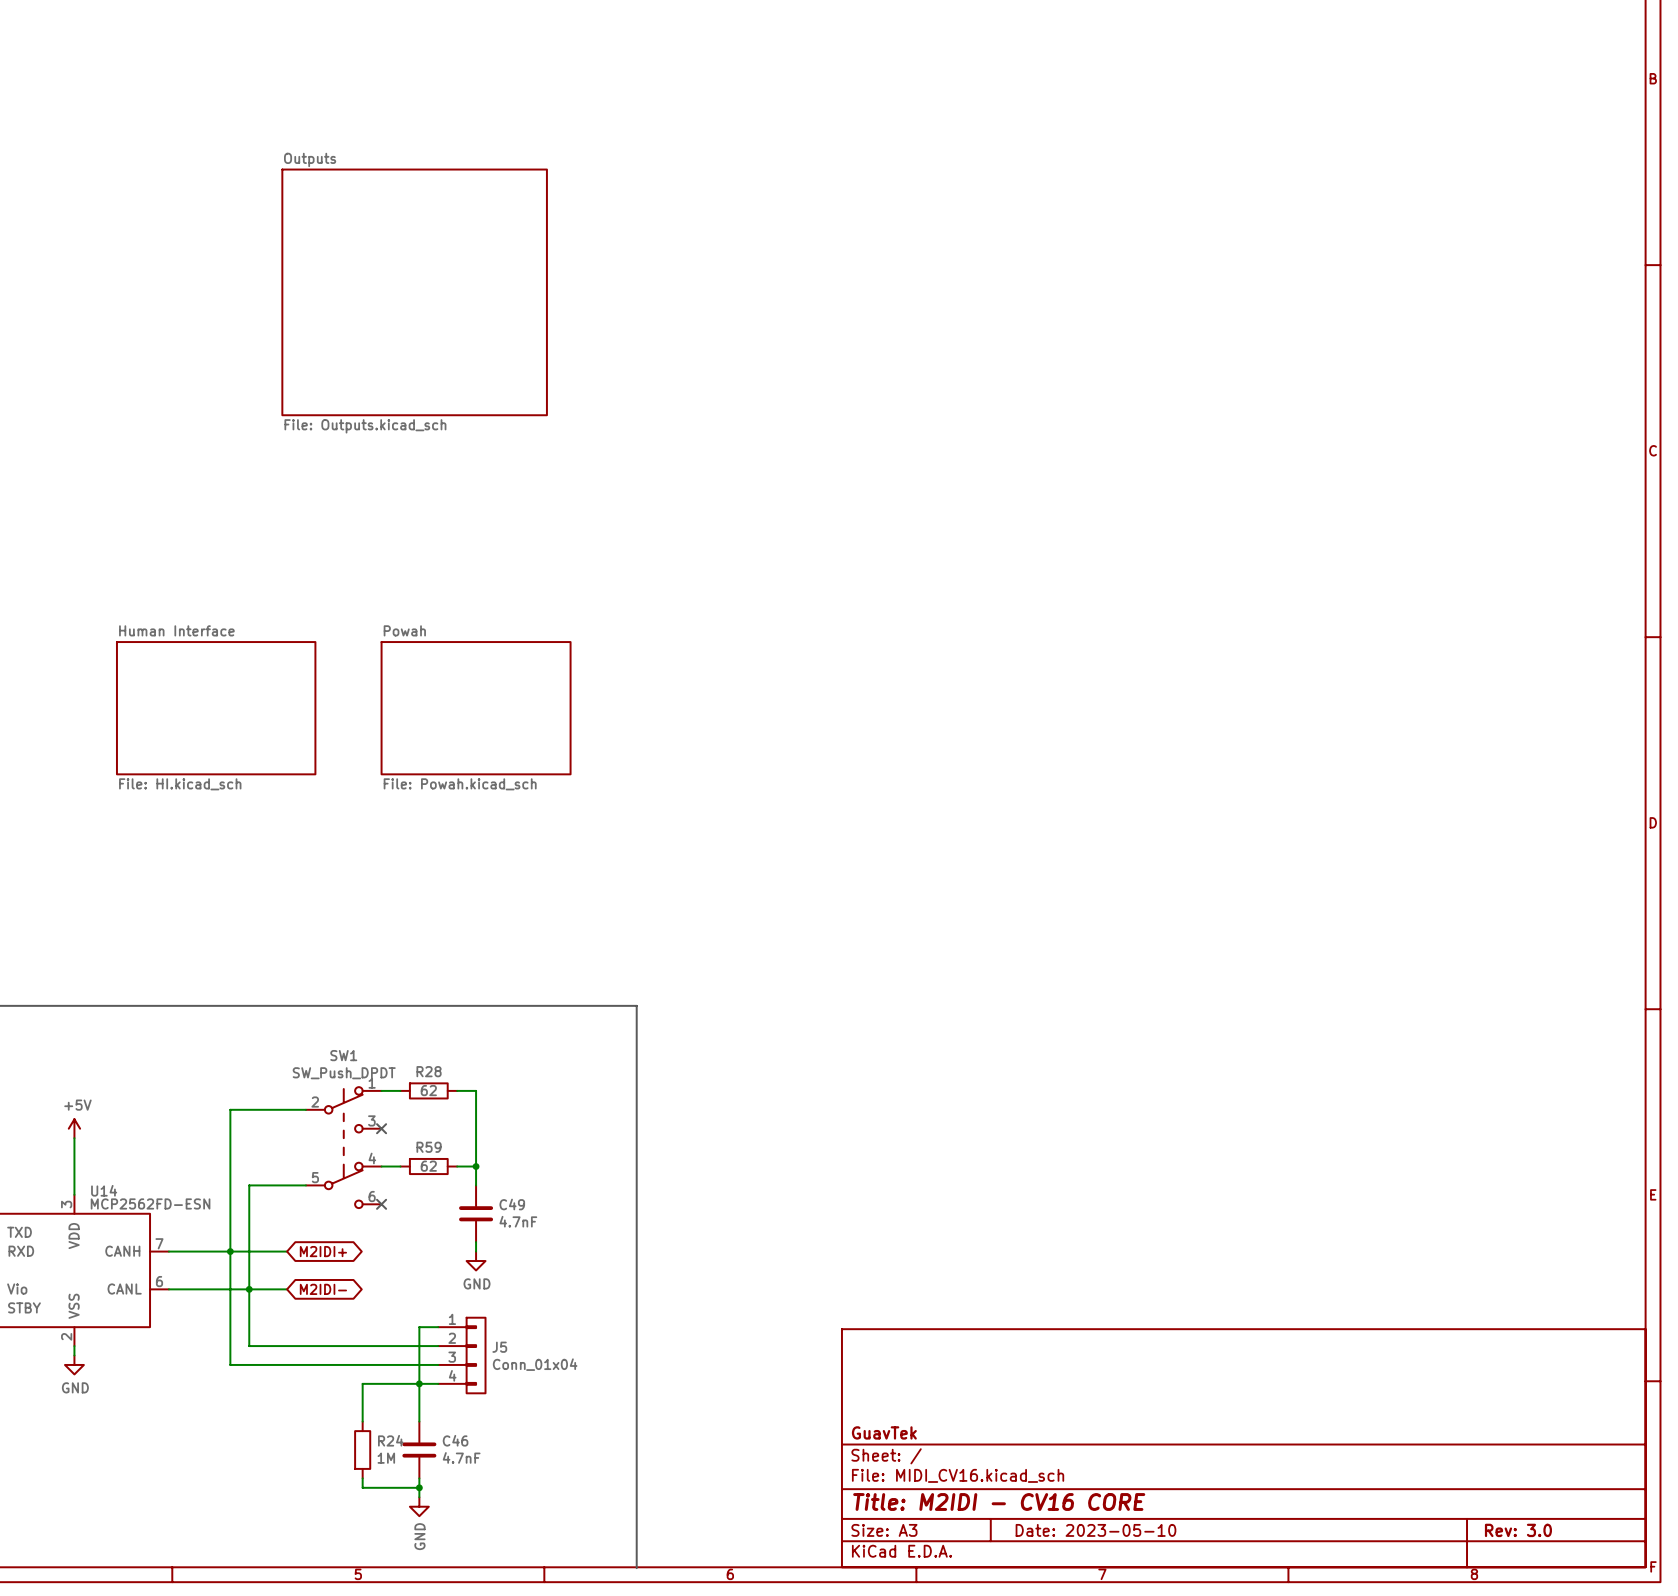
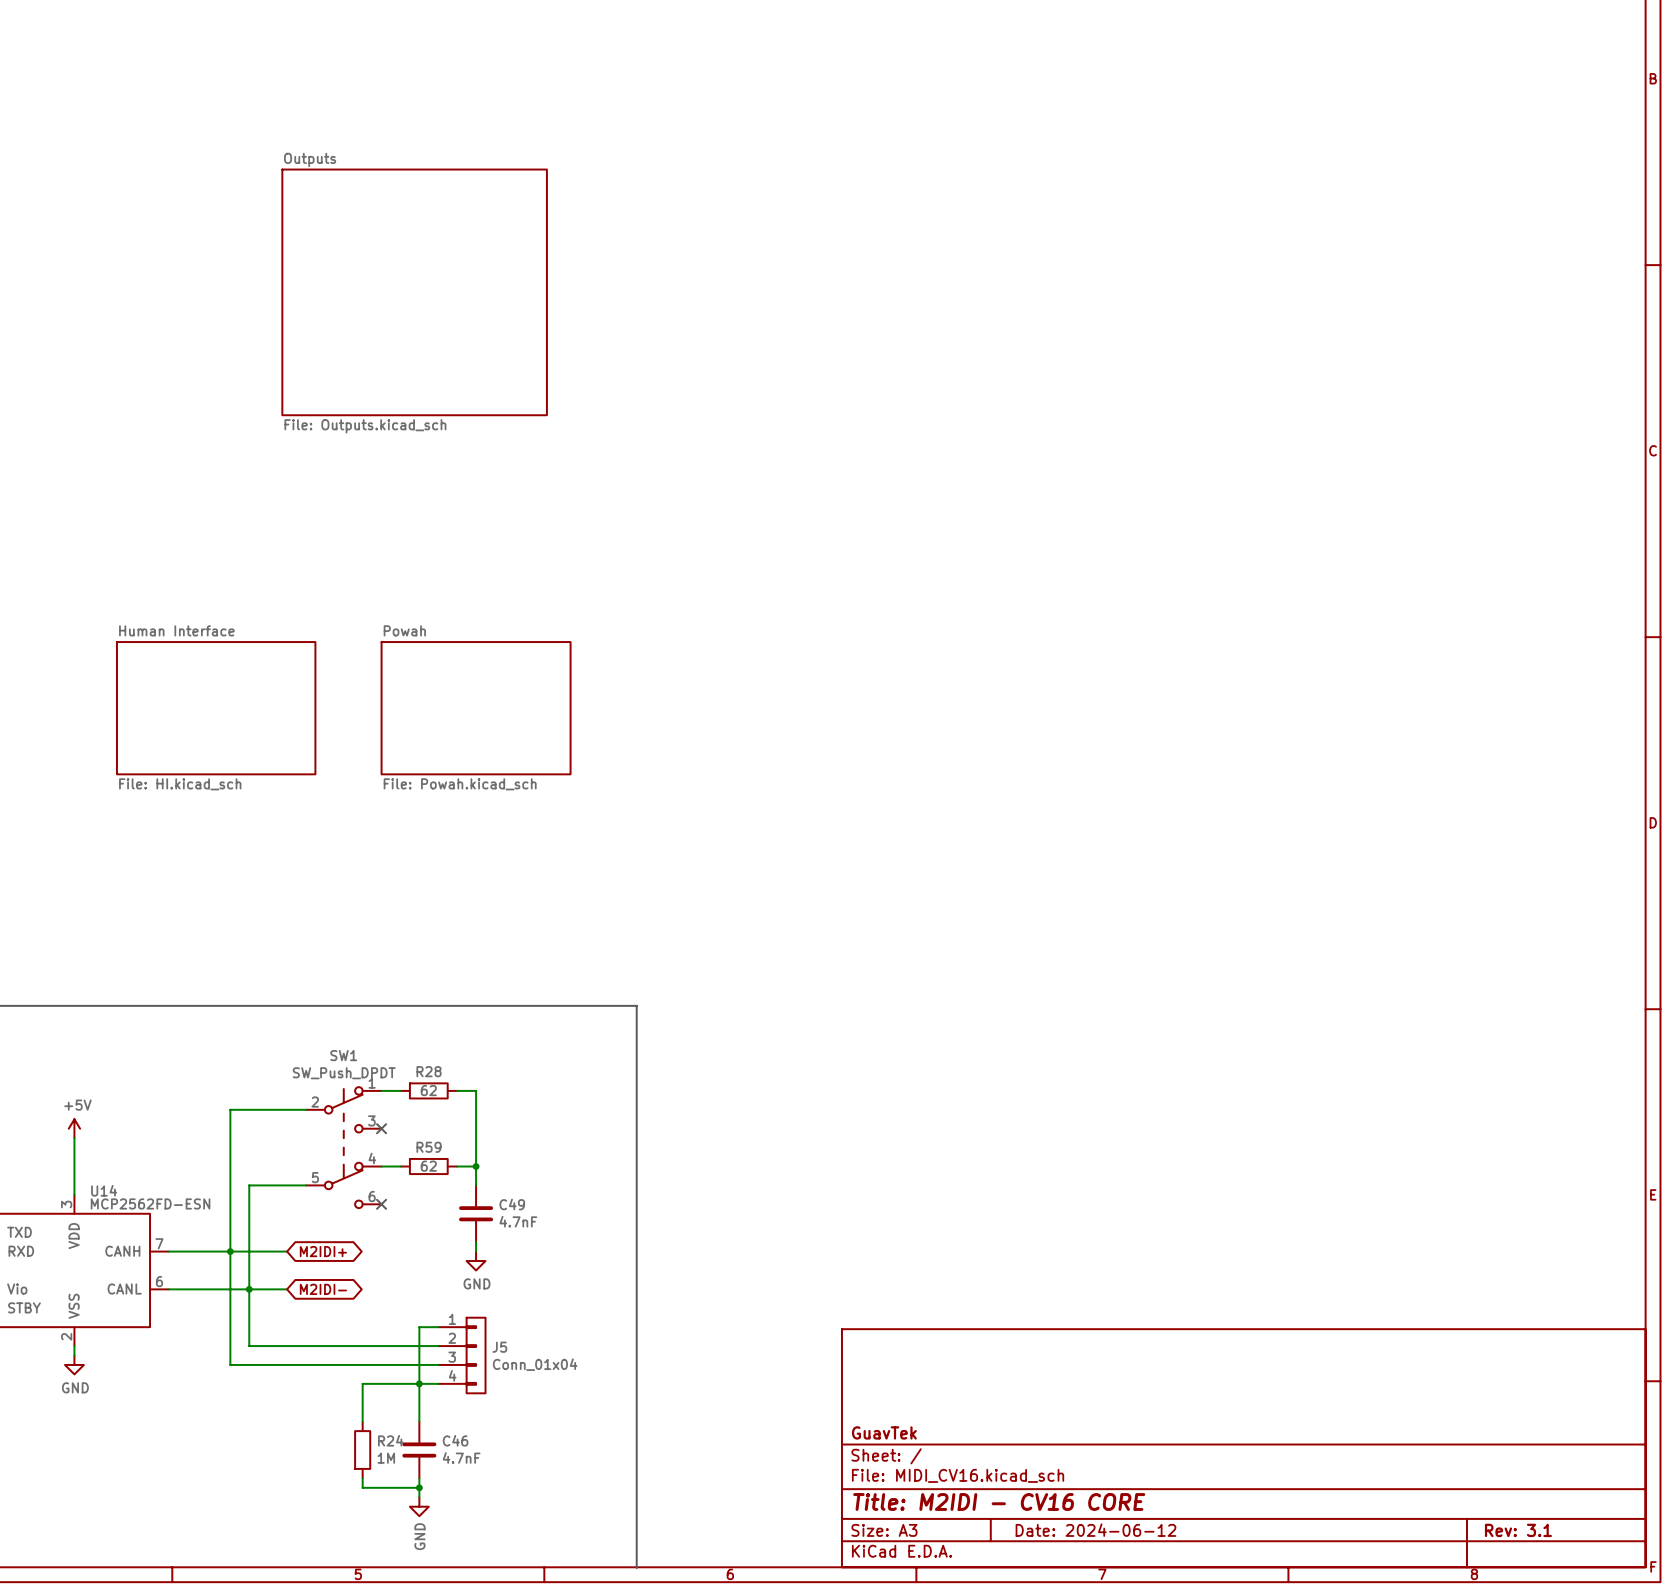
title block: Date: 2023-05-10 (1095, 1530) -> Date: 2024-06-12 (1095, 1530)
title block: Rev: 3.0 (1518, 1530) -> Rev: 3.1 (1518, 1530)

